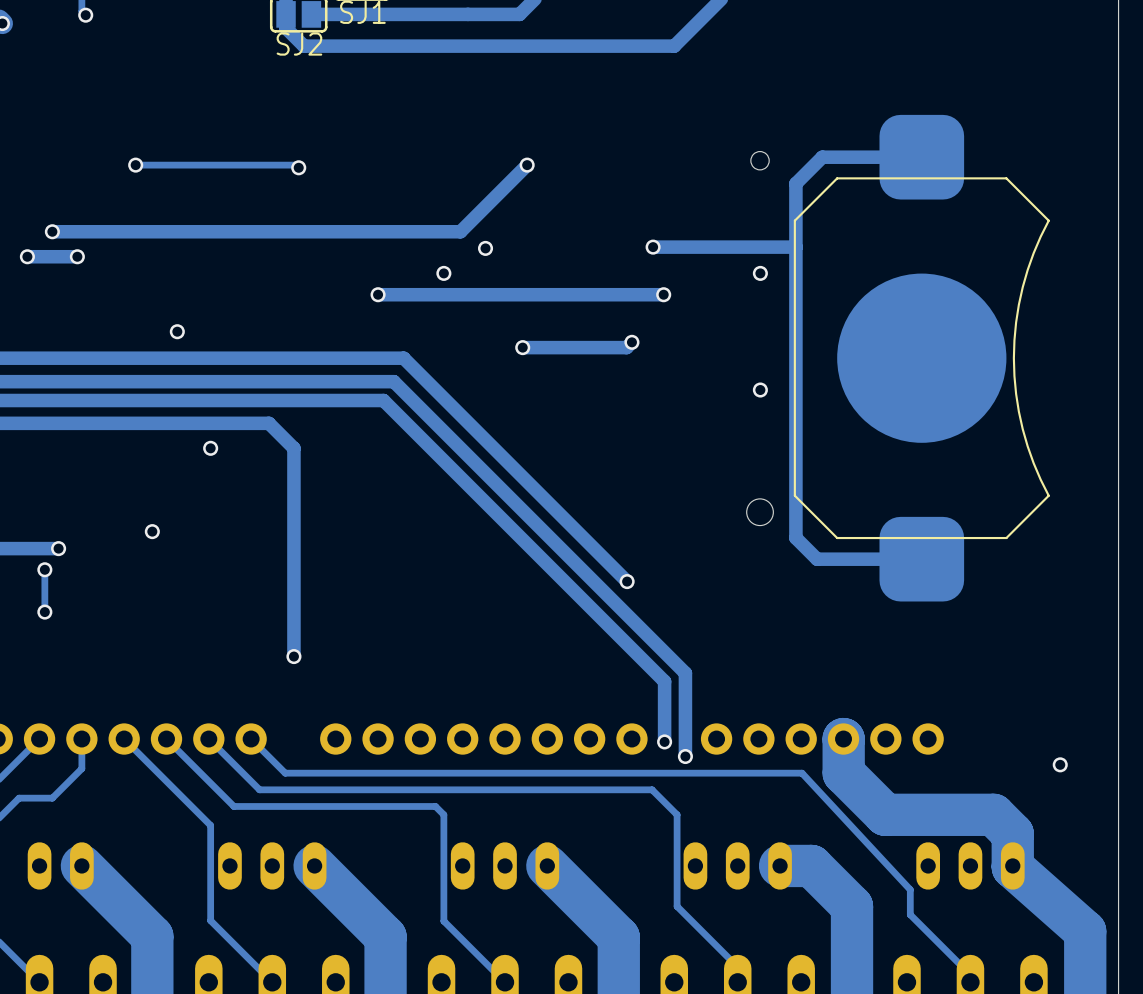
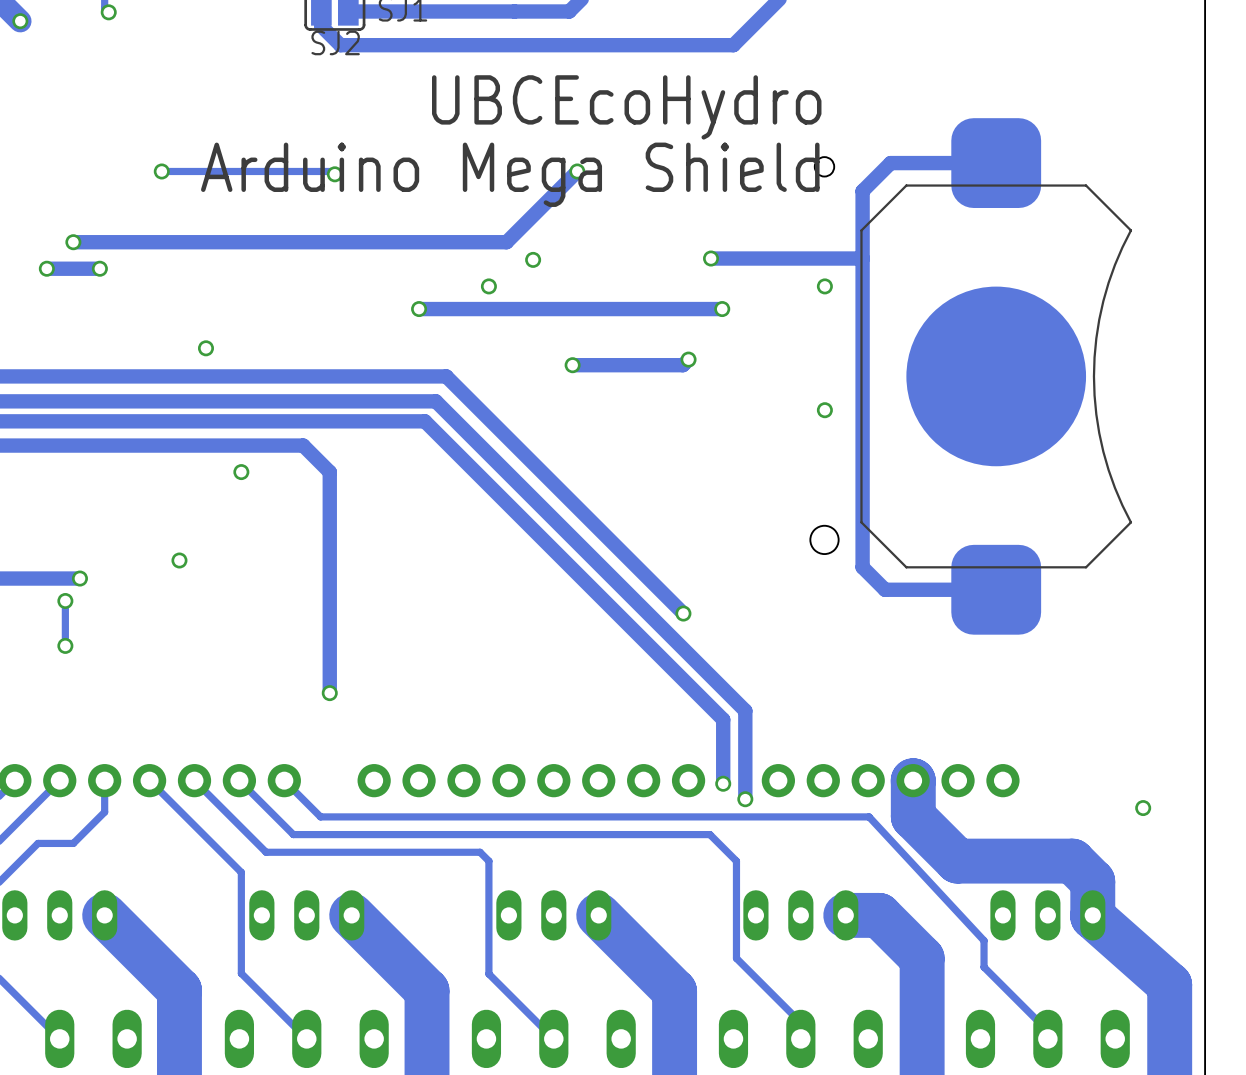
text: none -> UBCEcoHydro (626, 107)
text: none -> Arduino Mega Shield (510, 174)

